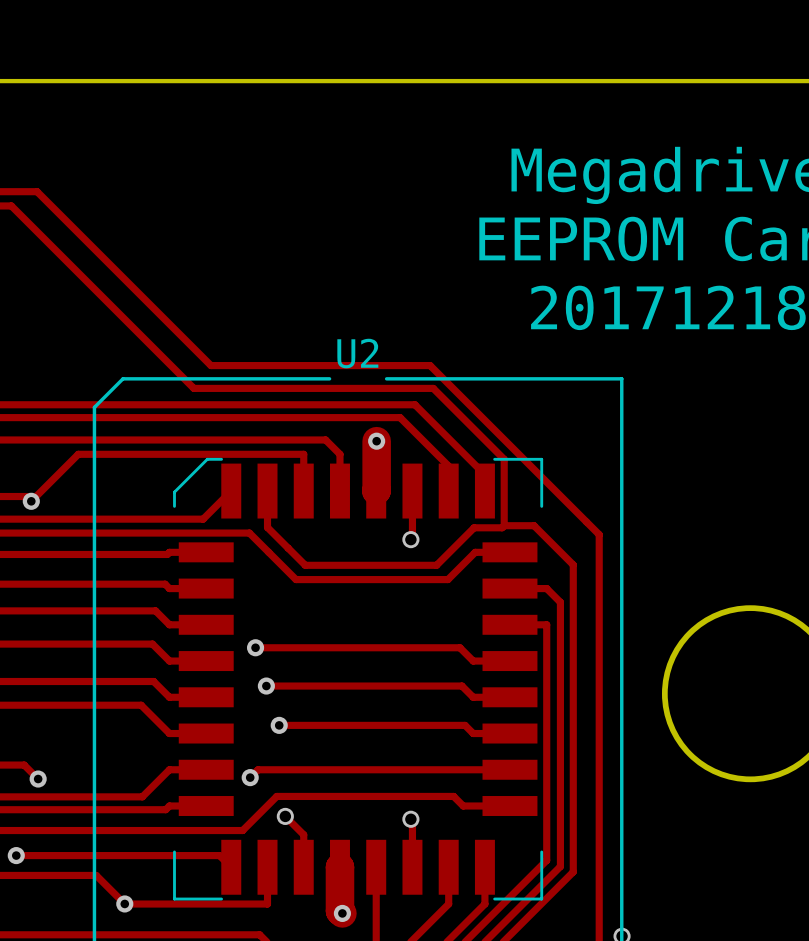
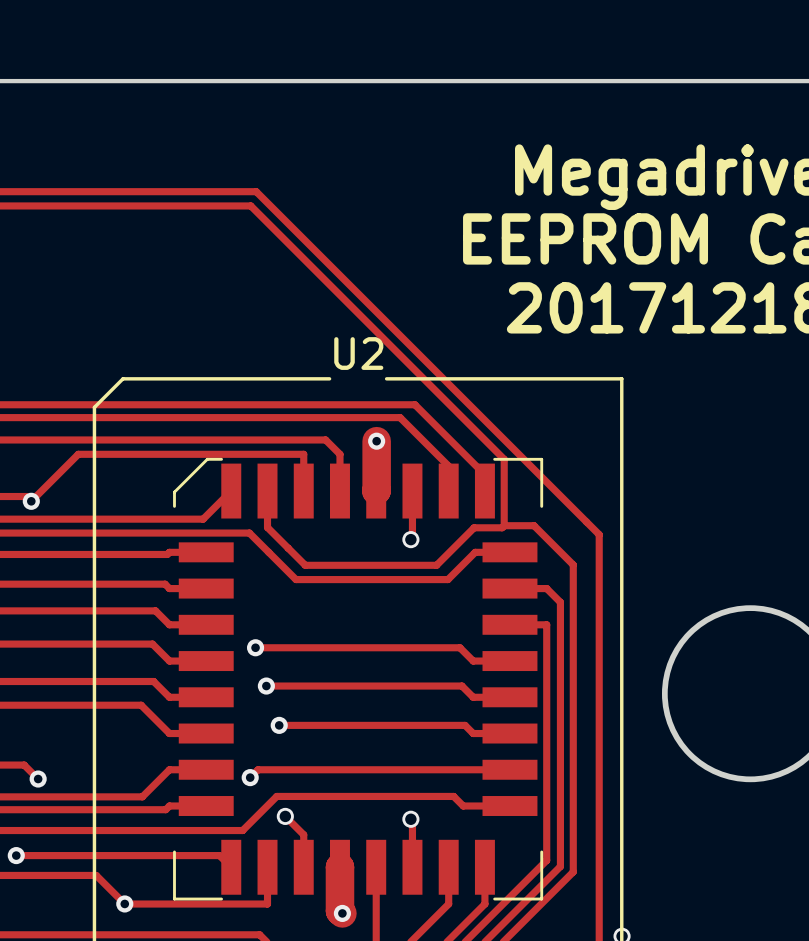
track: (37, 191) (210, 365) (430, 365) -> (37, 191) (256, 191) (430, 365)
track: (11, 205) (193, 388) (433, 388) -> (11, 205) (250, 205) (433, 388)

